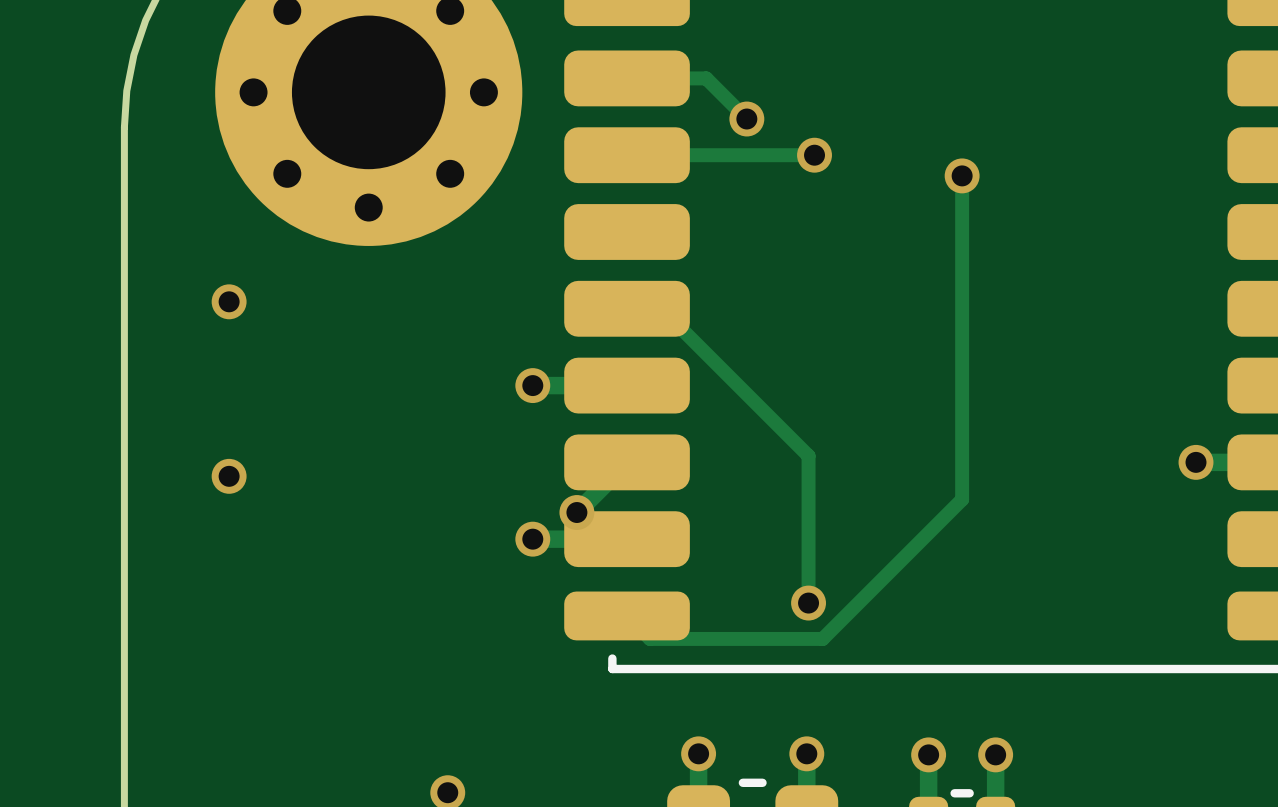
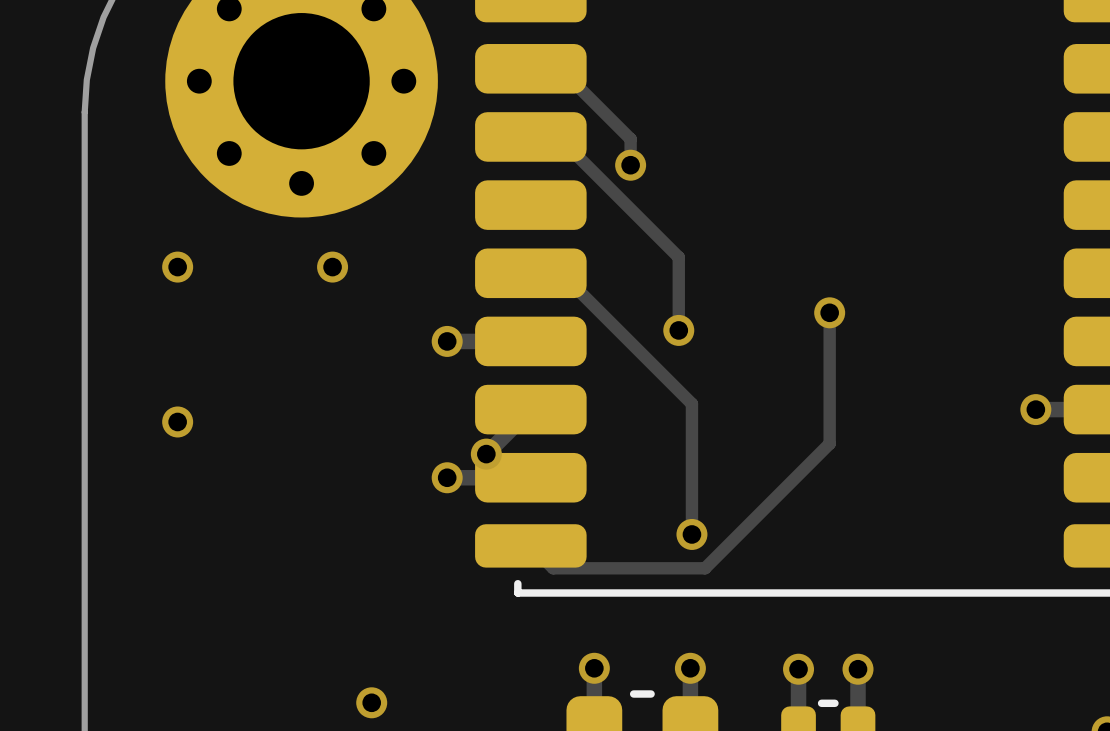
track: (660, 78) (706, 78) (746, 119) -> (560, 68) (630, 139) (630, 165)
via: (746, 119) -> none
track: (658, 155) (814, 155) -> (558, 136) (678, 257) (678, 330)
via: (814, 155) -> none
track: (962, 175) (962, 499) (822, 638) (650, 638) -> (829, 312) (829, 443) (705, 568) (553, 568) (551, 566)
via: (962, 175) -> none
via: none -> (630, 165)
via: none -> (332, 267)
via: none -> (829, 312)
via: none -> (678, 330)

